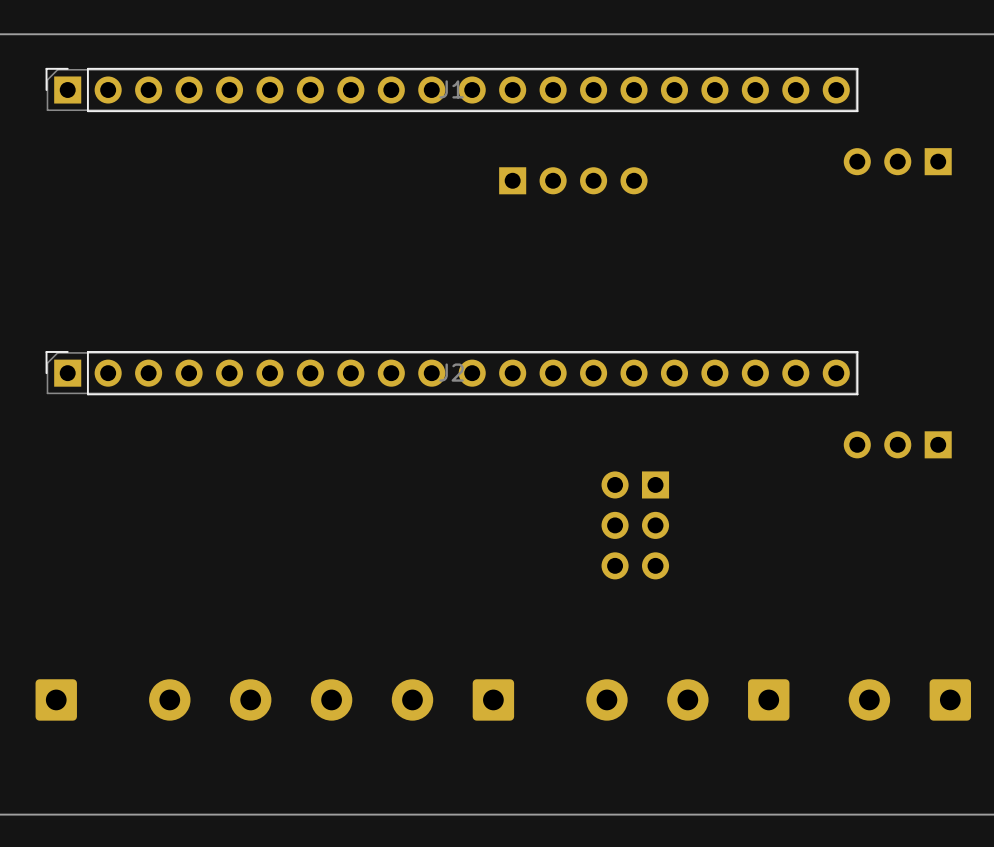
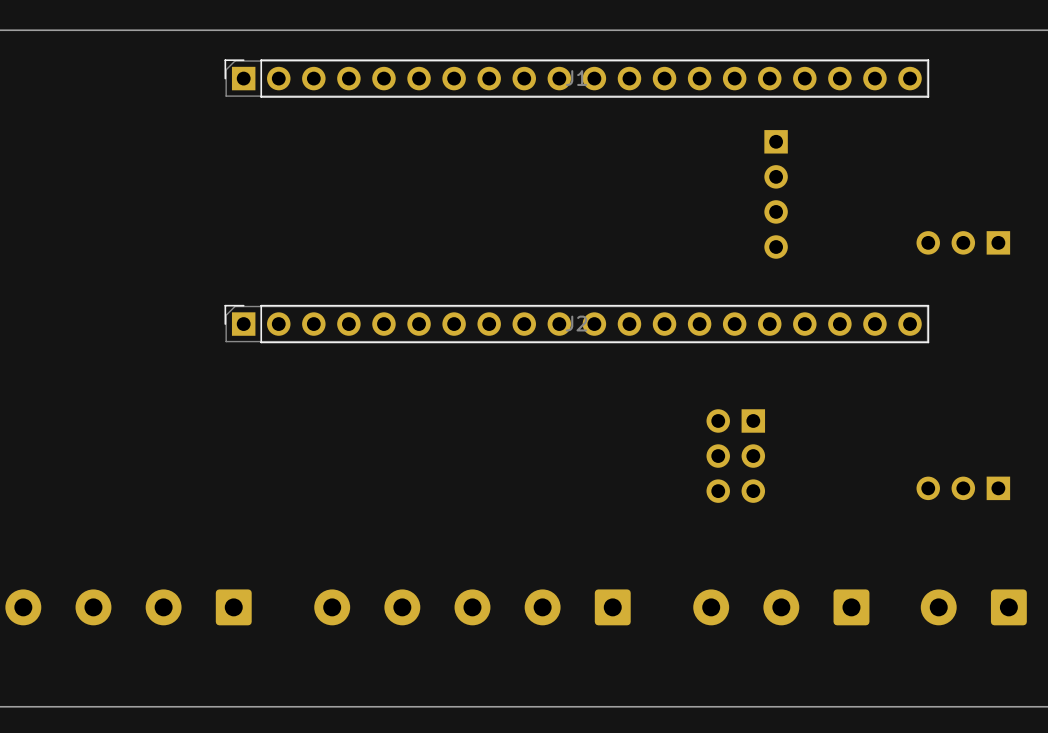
part: (897, 161) -> none
part rotation: 0° (573, 180) -> 90° clockwise (776, 194)
part position: (573, 180) -> (776, 194)
part: none -> (963, 242)
part: (897, 444) -> none
part: none -> (963, 488)

